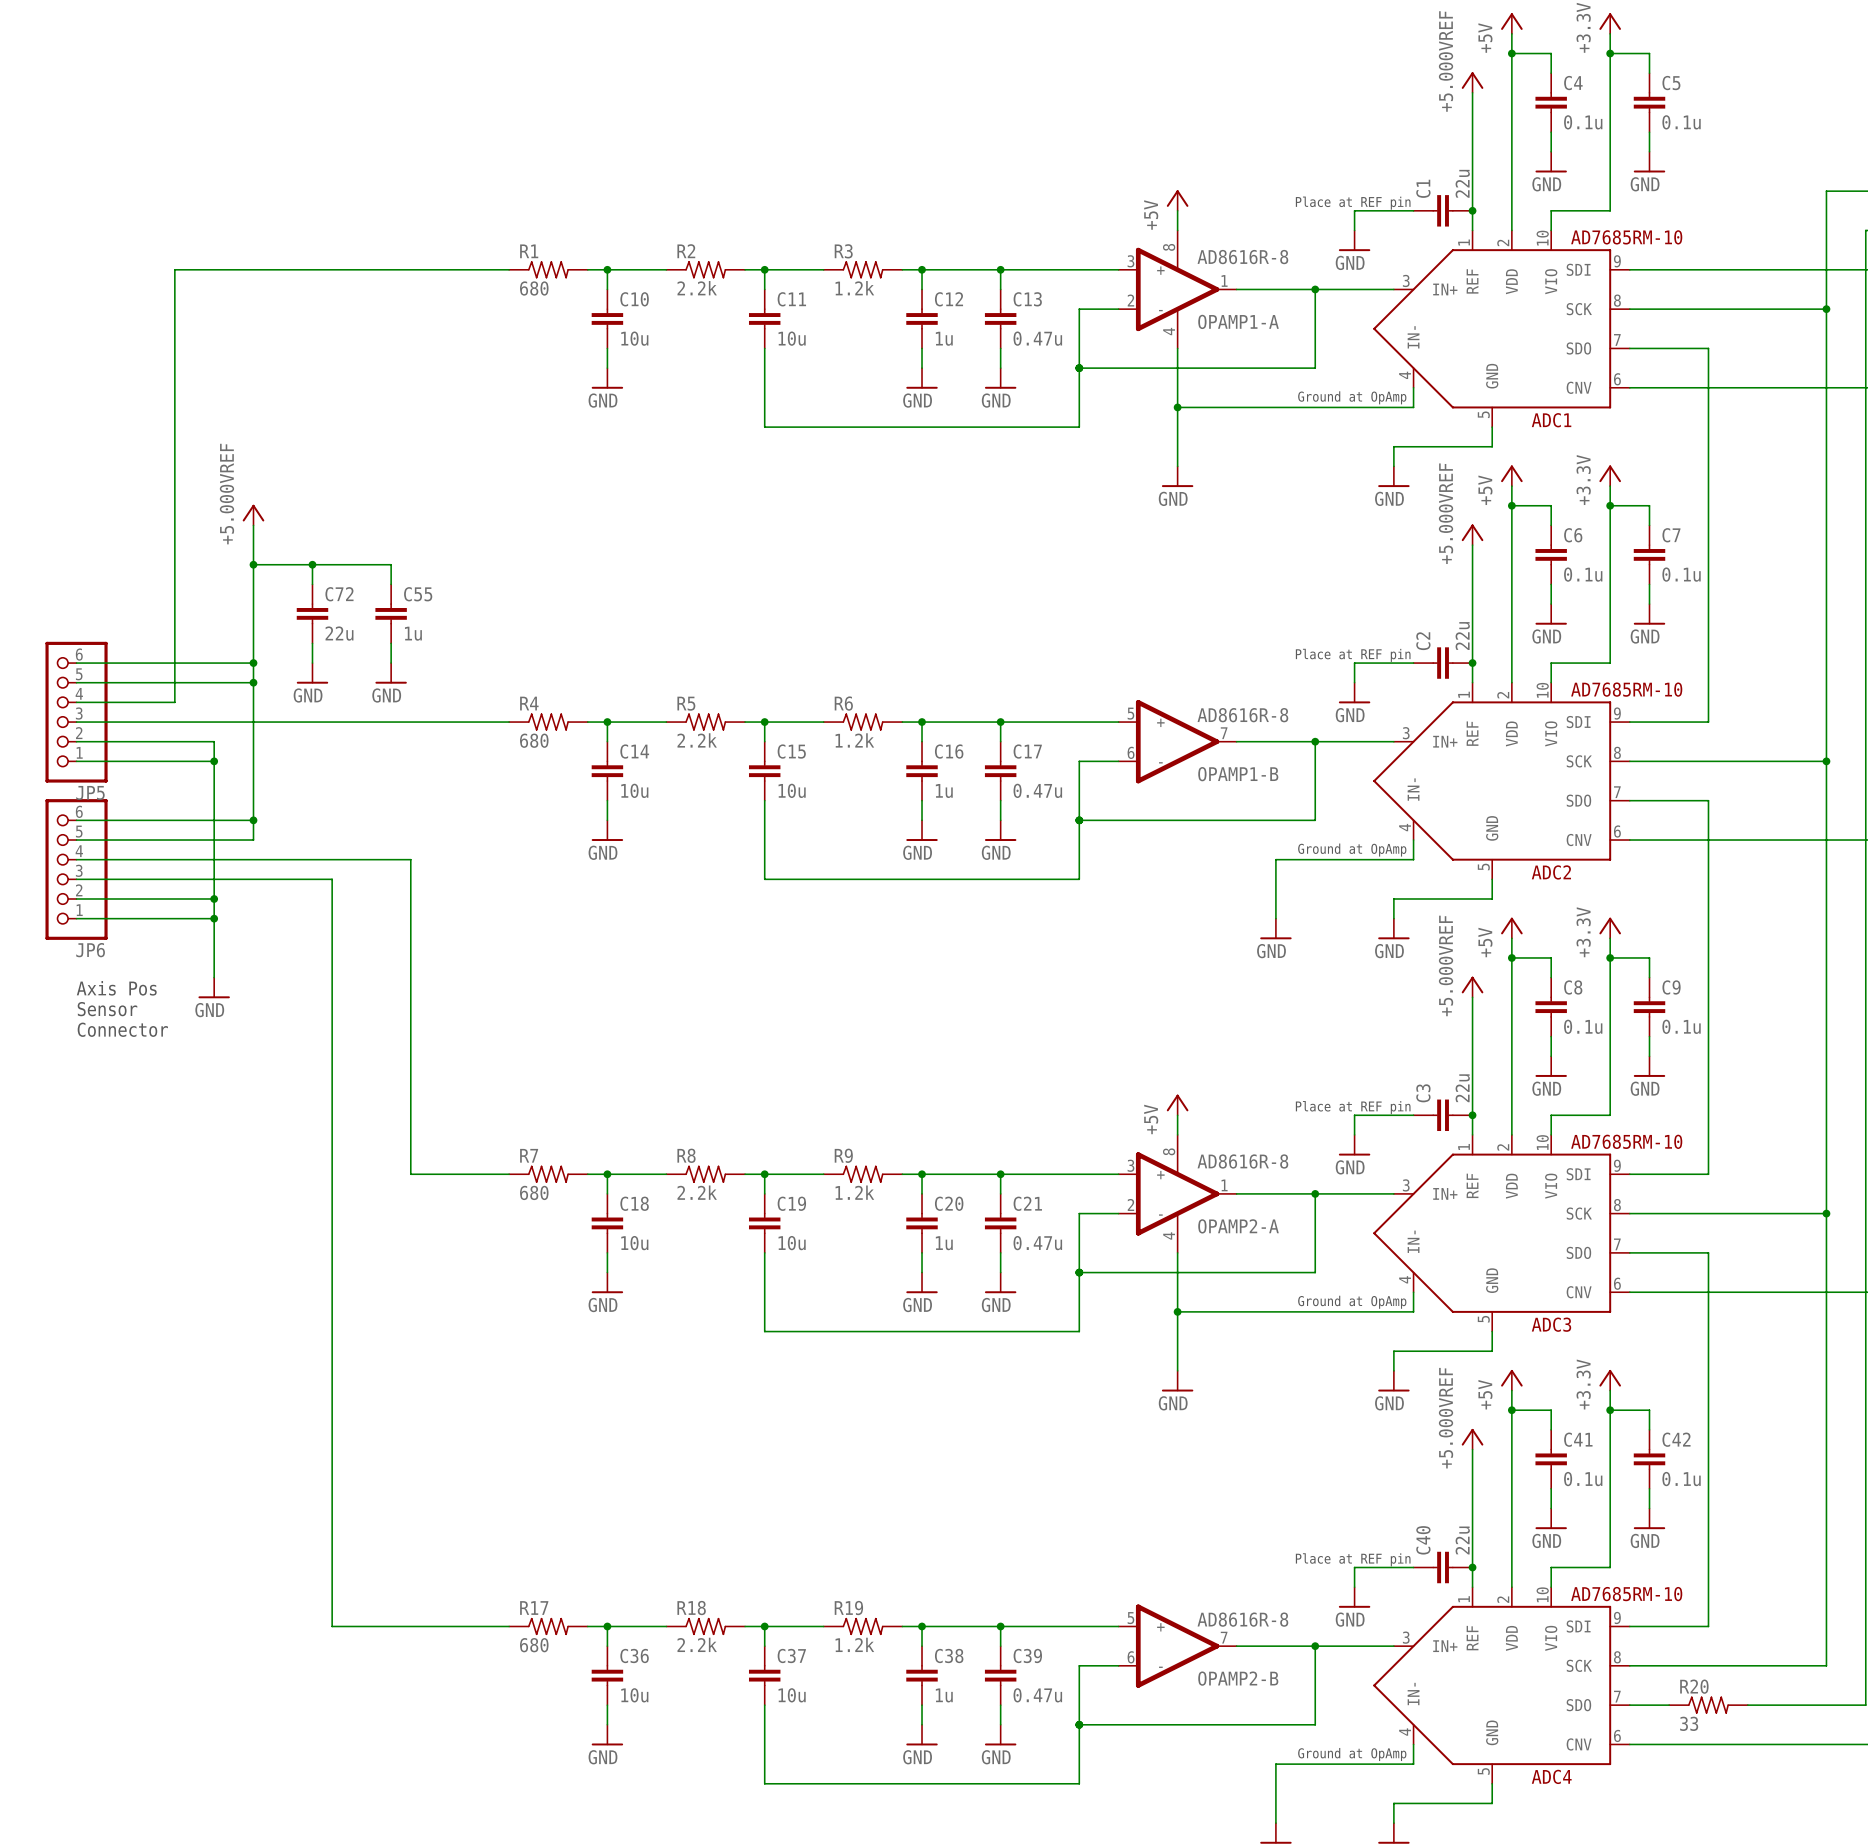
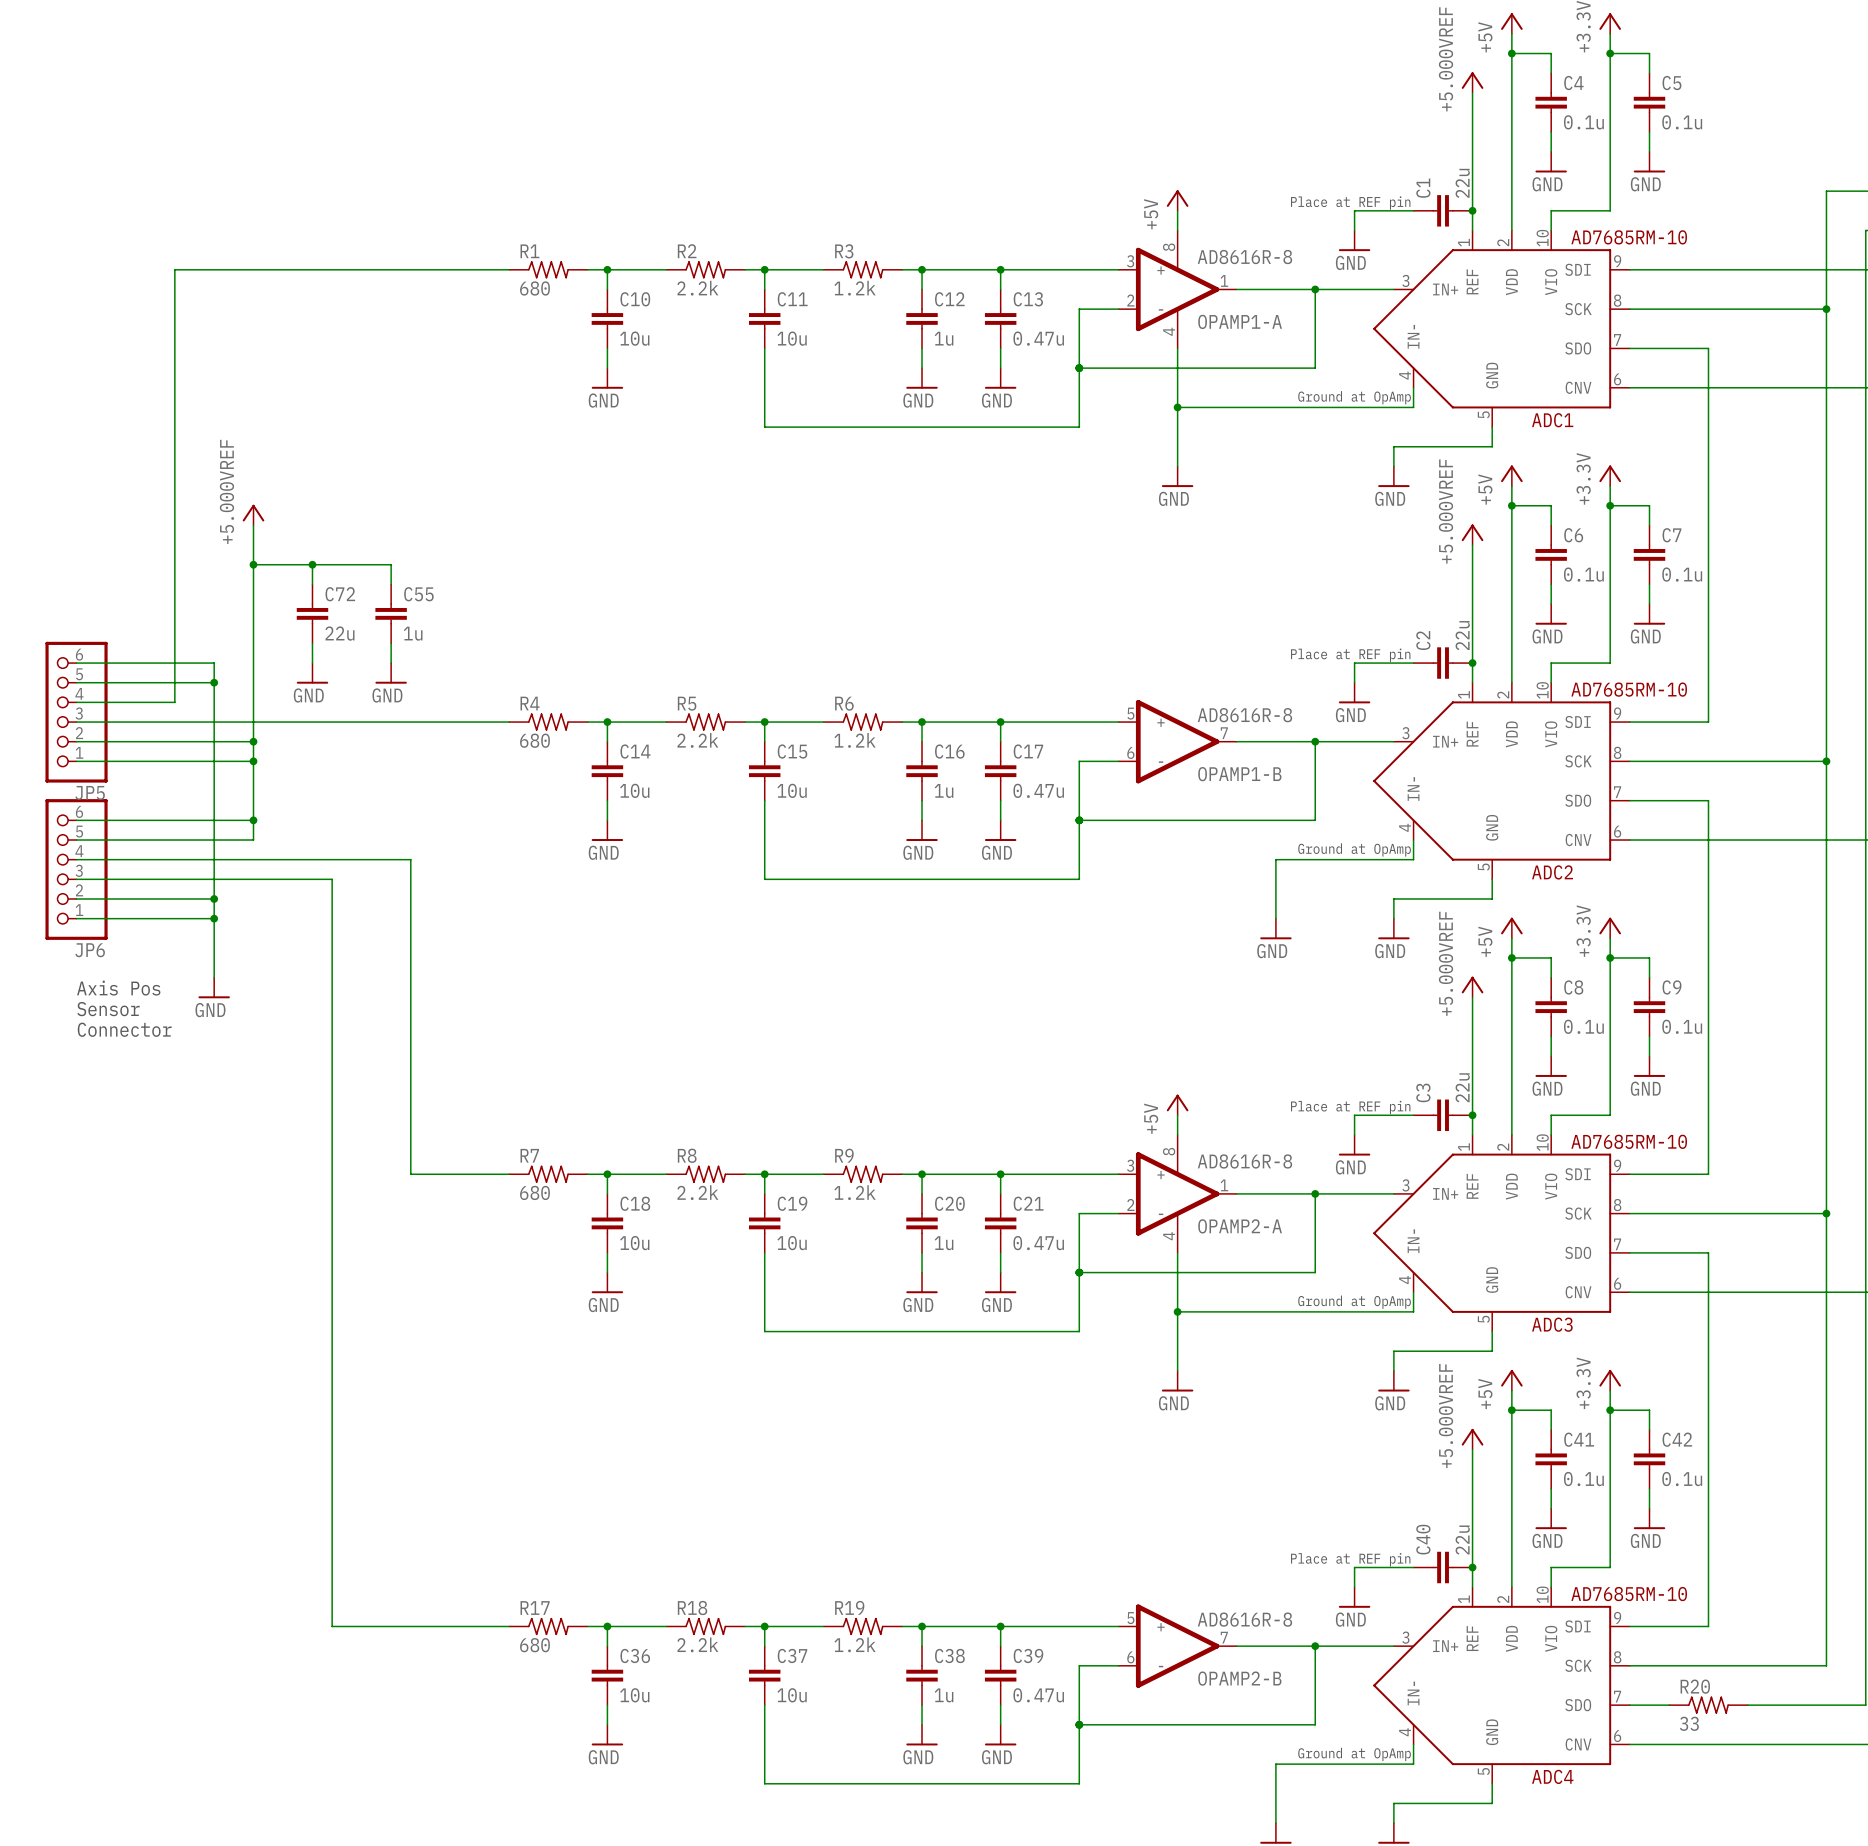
wire: (214, 663) (253, 663) -> (214, 663) (214, 741) (253, 741)
junction: (253, 663) -> none
wire: (214, 682) (253, 682) -> (214, 761) (253, 761)
junction: none -> (214, 682)
junction: (253, 682) -> none
junction: none -> (253, 741)
junction: (214, 761) -> none
junction: none -> (253, 761)

